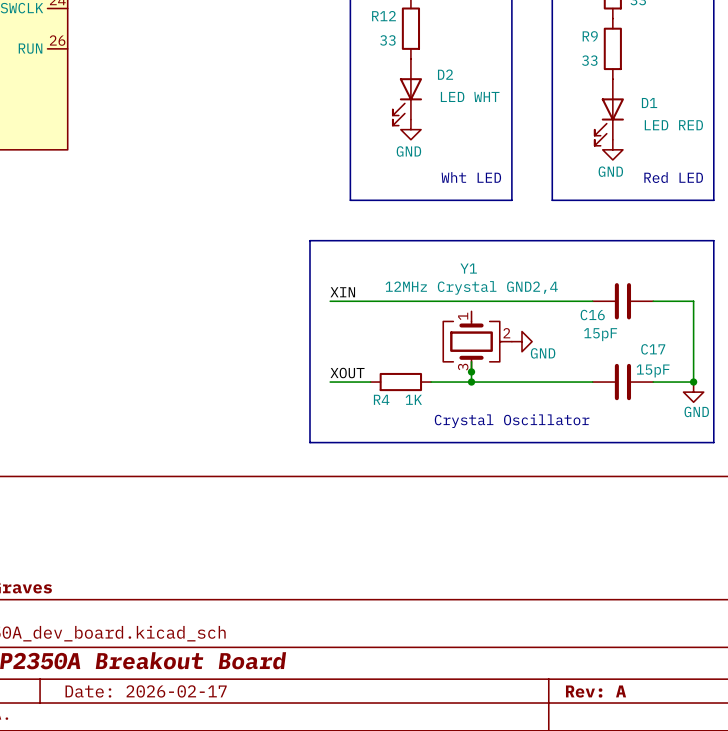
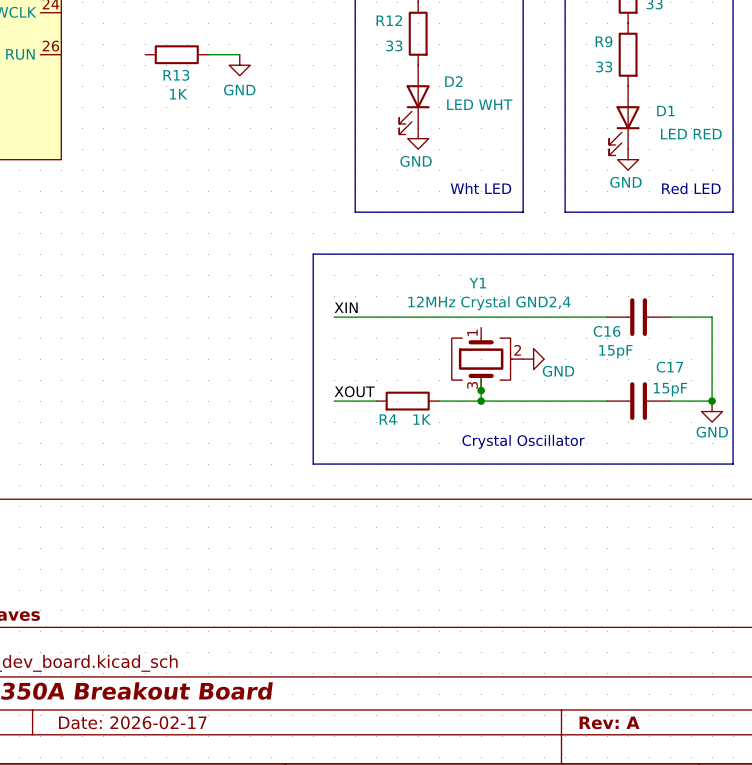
R13: none -> 1K (176, 54)
wire: none -> (208, 54) (239, 54)
power symbol: none -> GND (239, 65)

